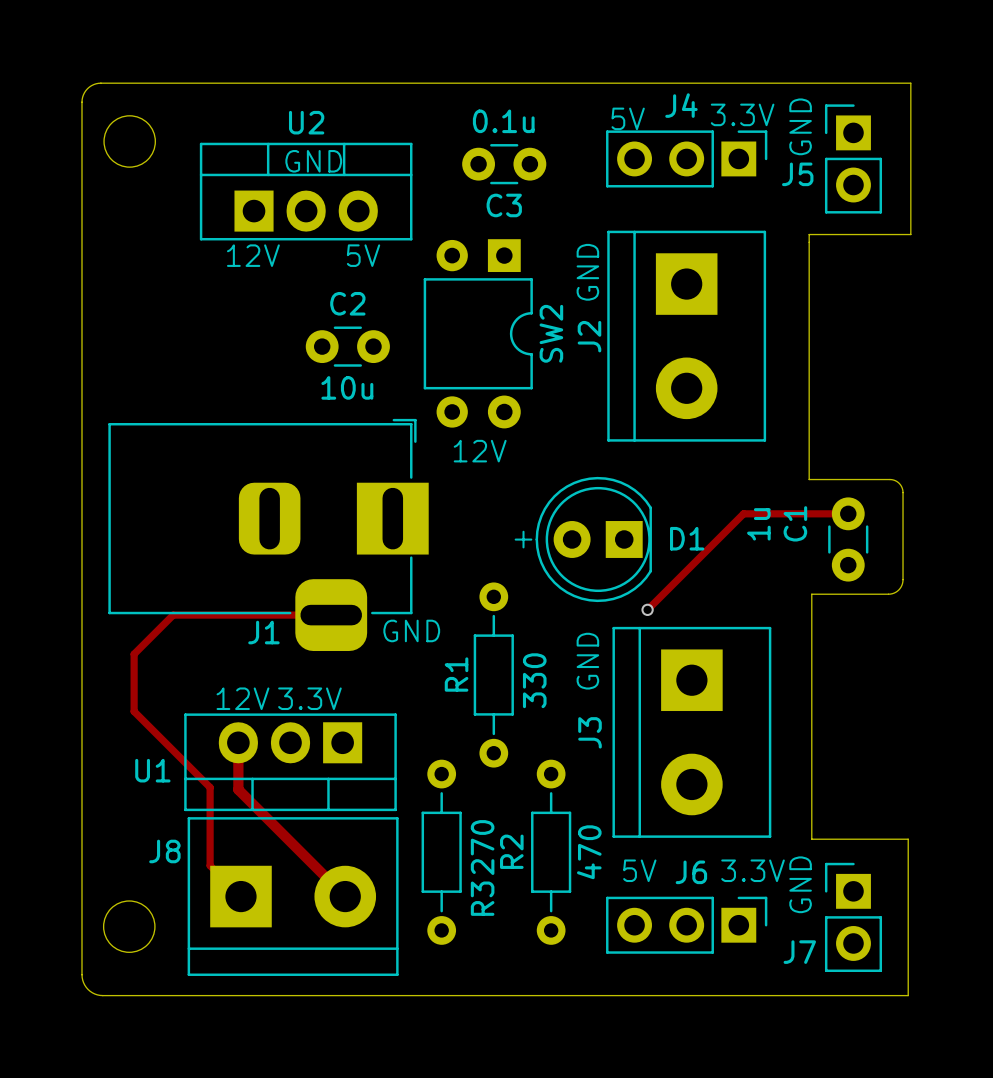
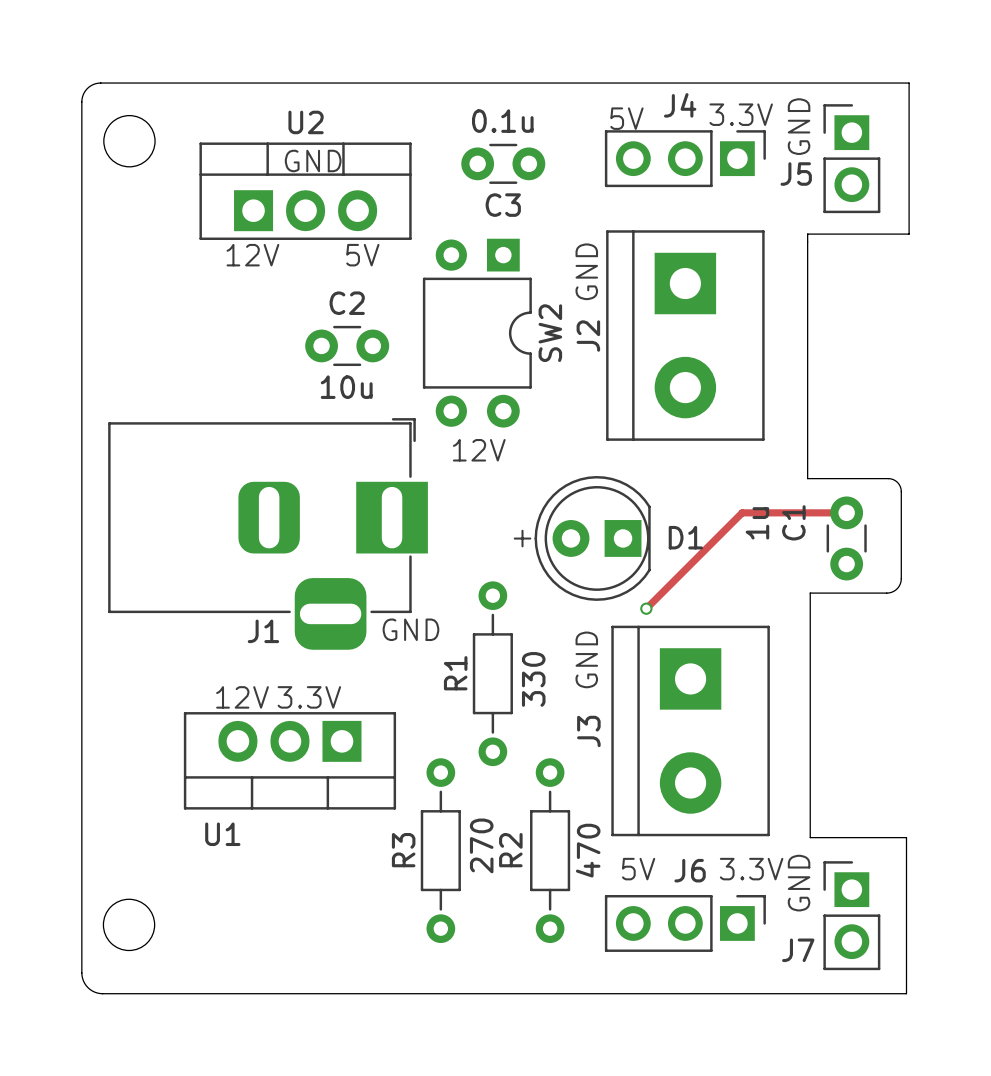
track: (331, 615) (173, 615) (134, 654) (134, 711) (210, 787) (210, 865) (240, 896) -> none
track: (238, 742) (238, 789) (345, 896) -> none
U1 name position: U1 (152, 770) -> U1 (222, 834)
J8: (293, 896) -> none
R3 name position: R3 (482, 898) -> R3 (403, 850)

